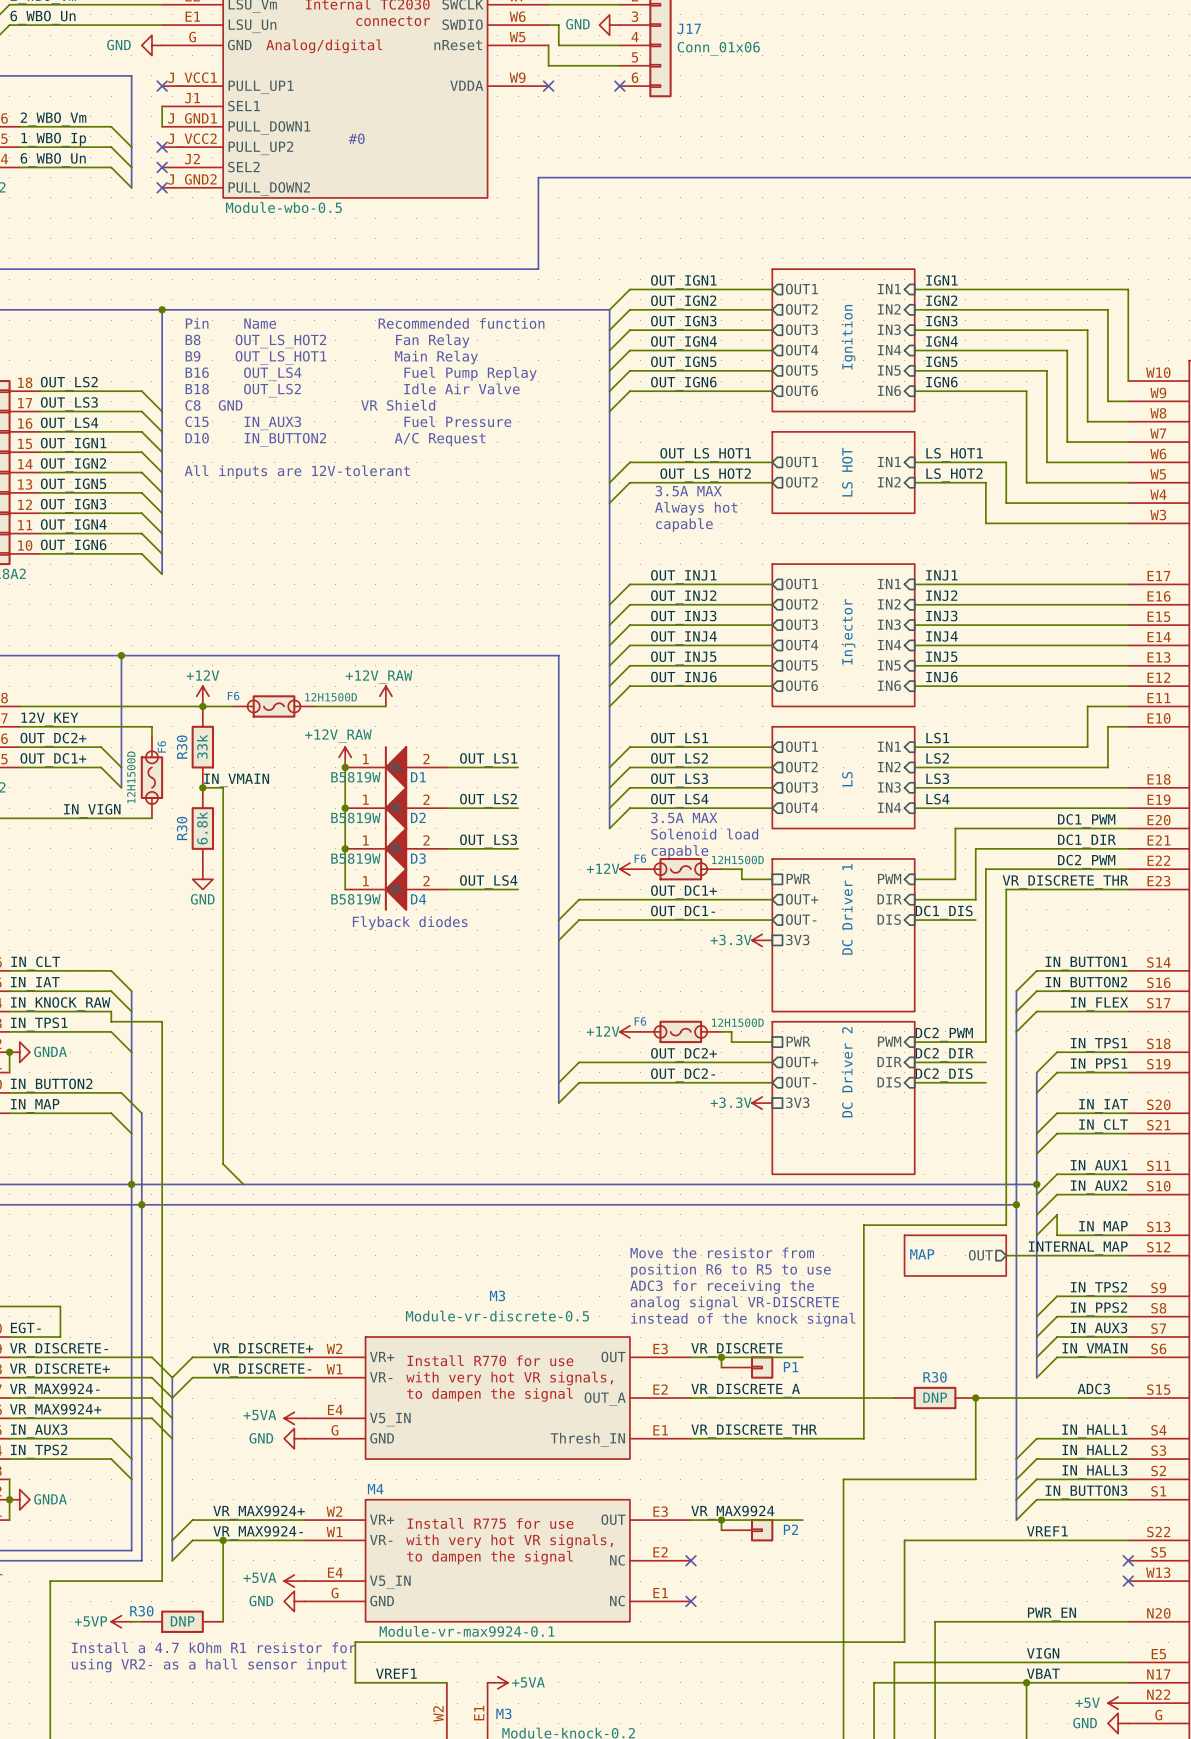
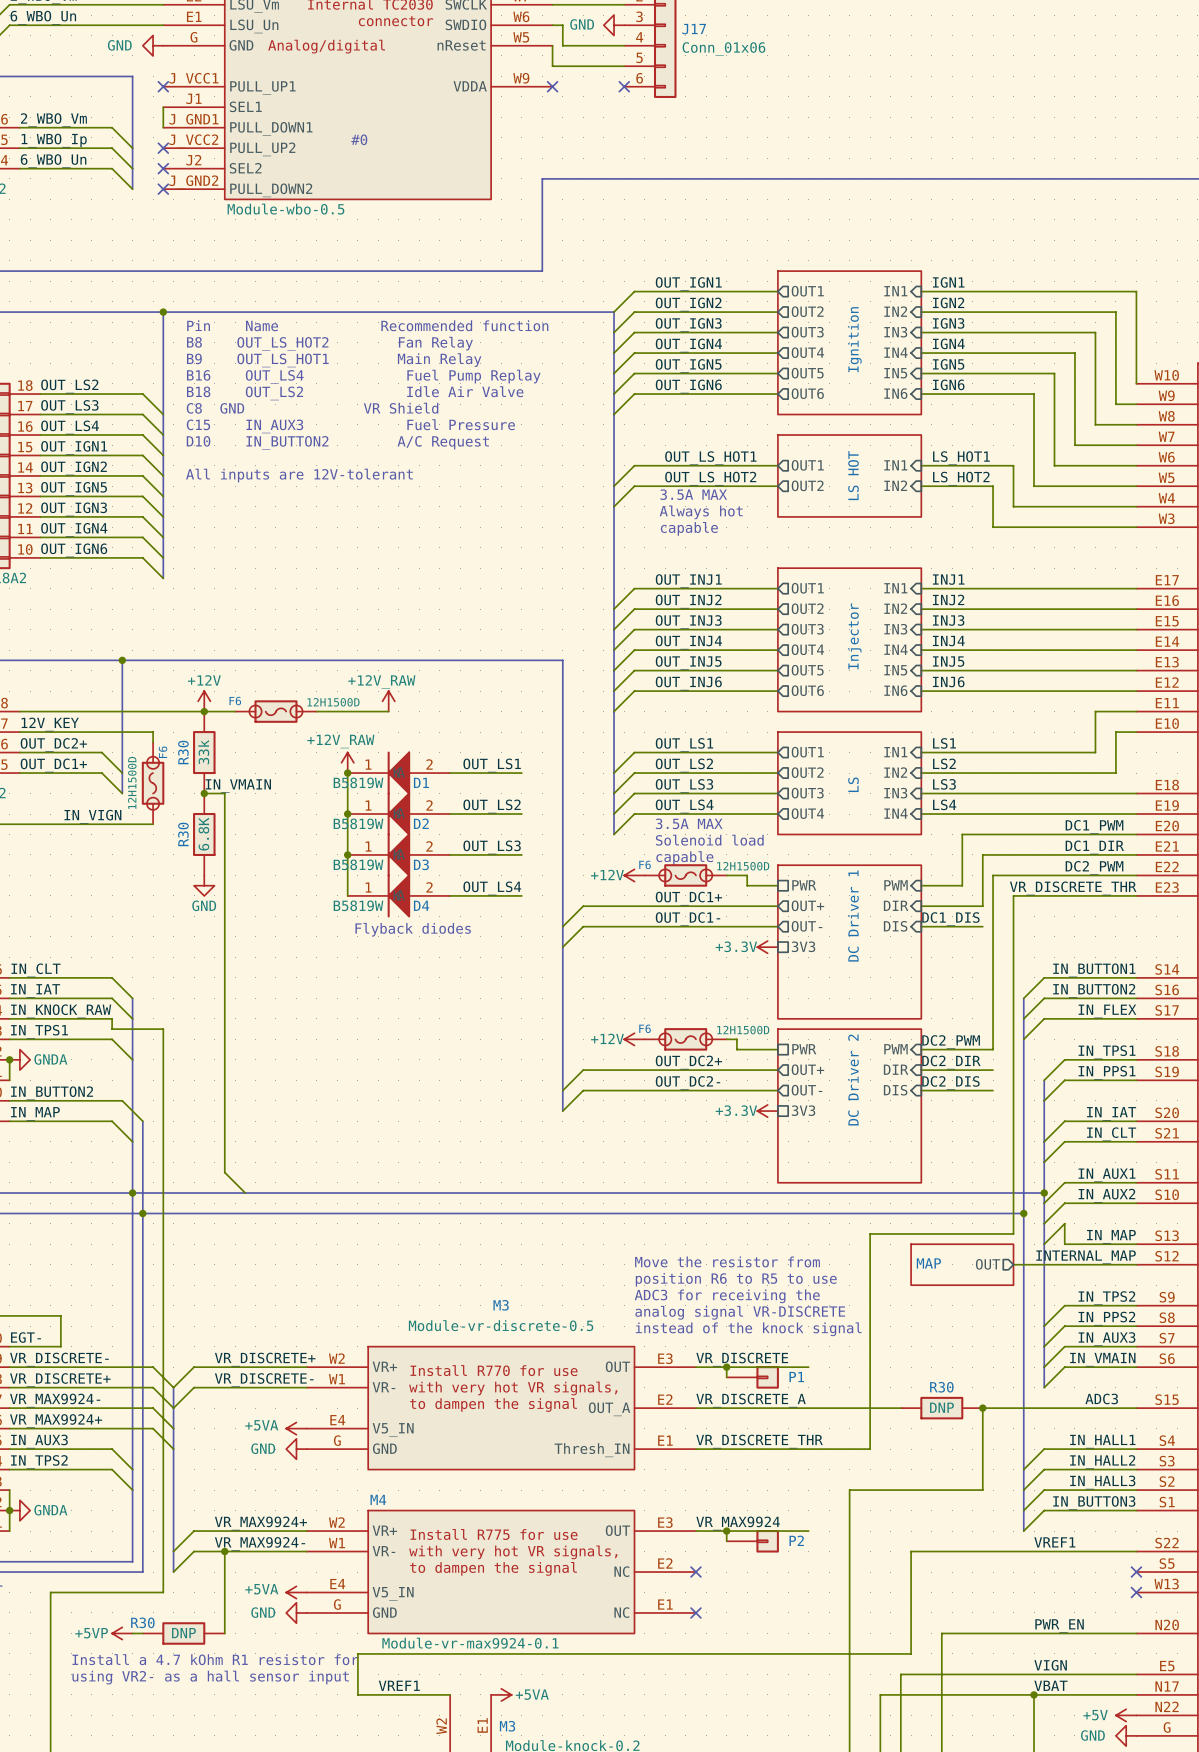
R30 value: 6.8k (202, 828) -> 6.8K (203, 834)

